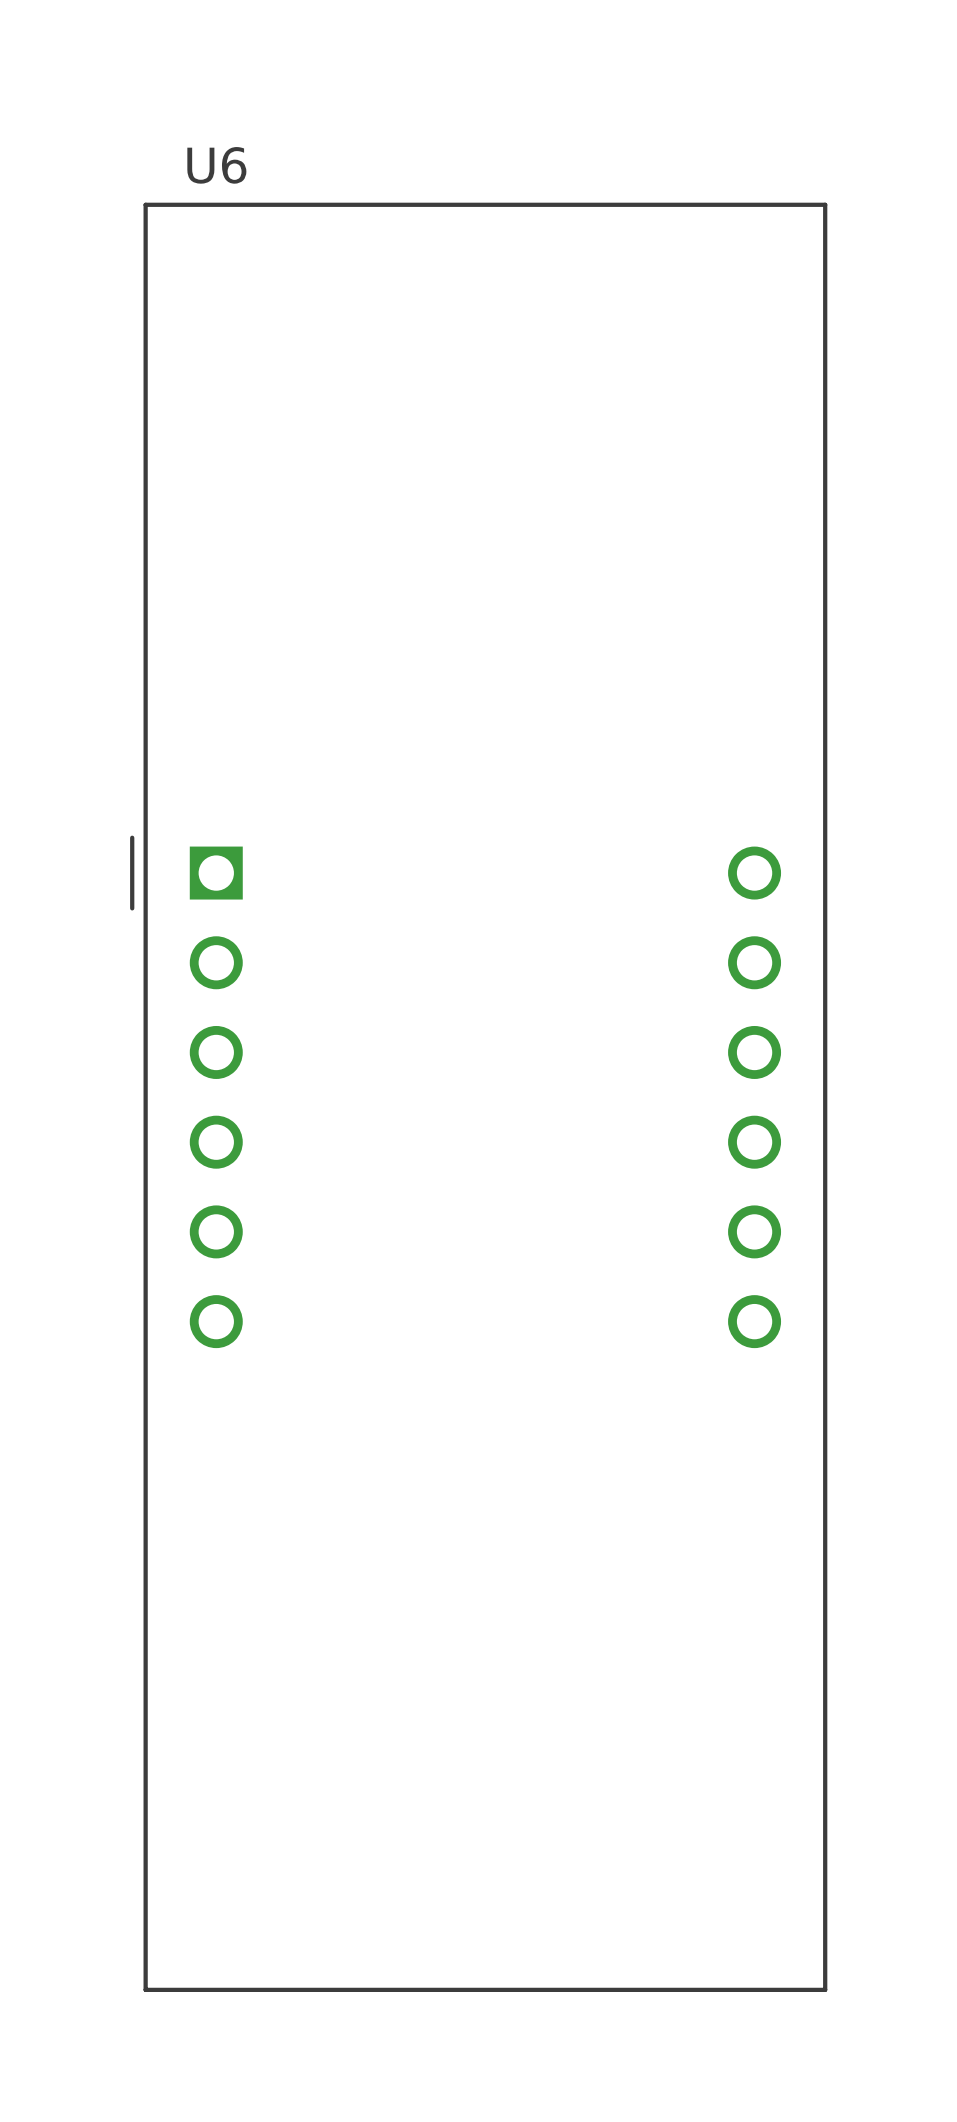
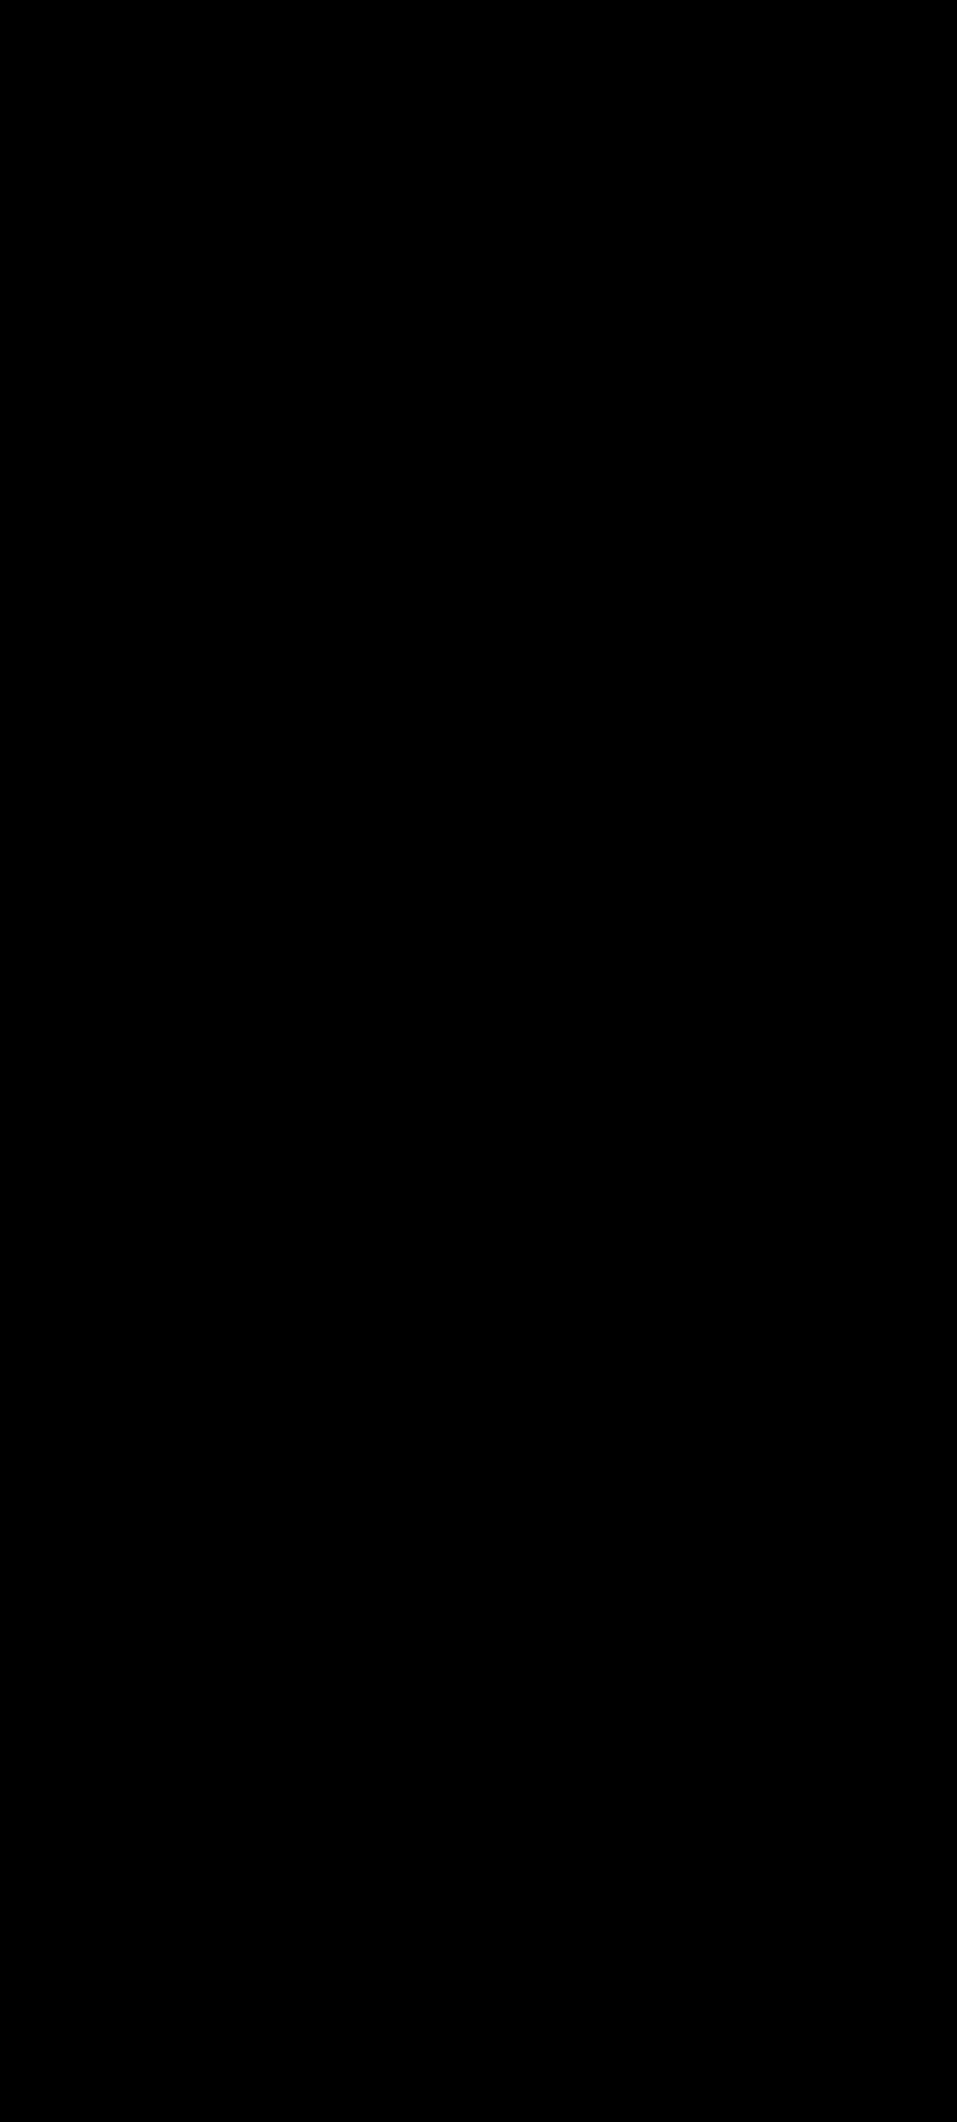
U6: (478, 1097) -> none

